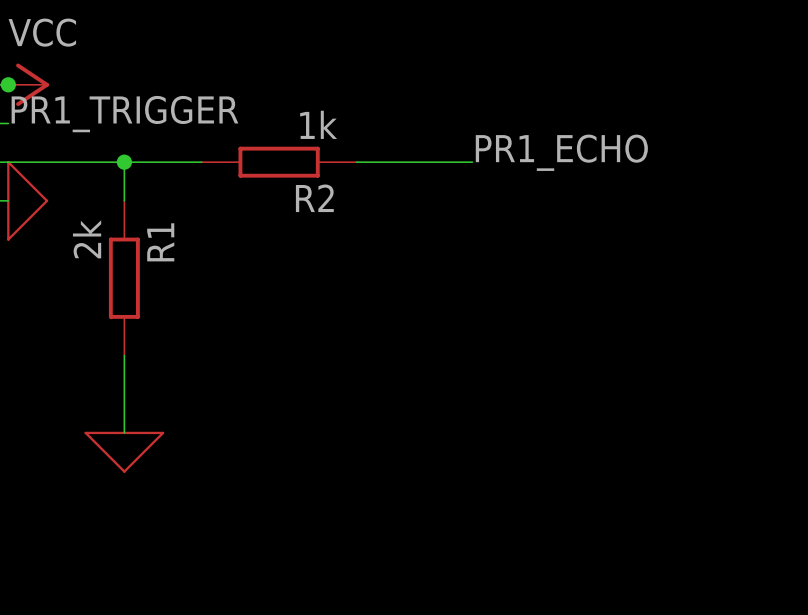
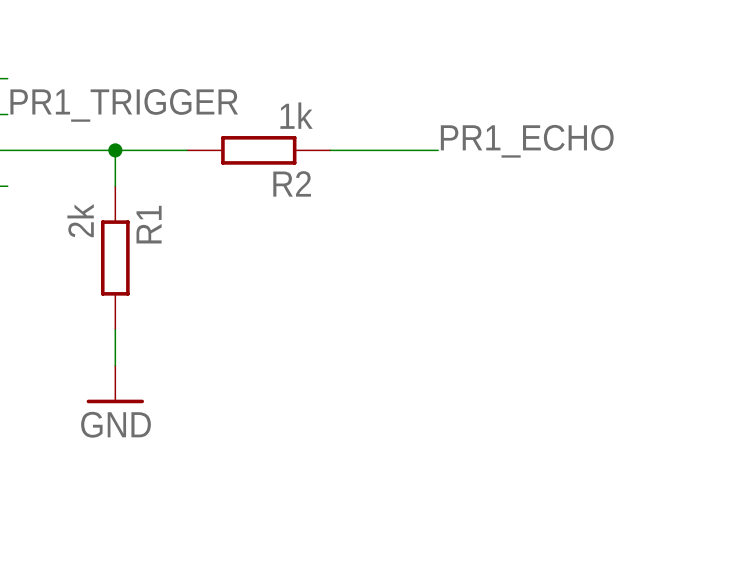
junction: (8, 84) -> none
power symbol: VCC (28, 84) -> none
power symbol: (27, 200) -> none
power symbol: none -> GND (115, 384)
power symbol: (124, 452) -> none

